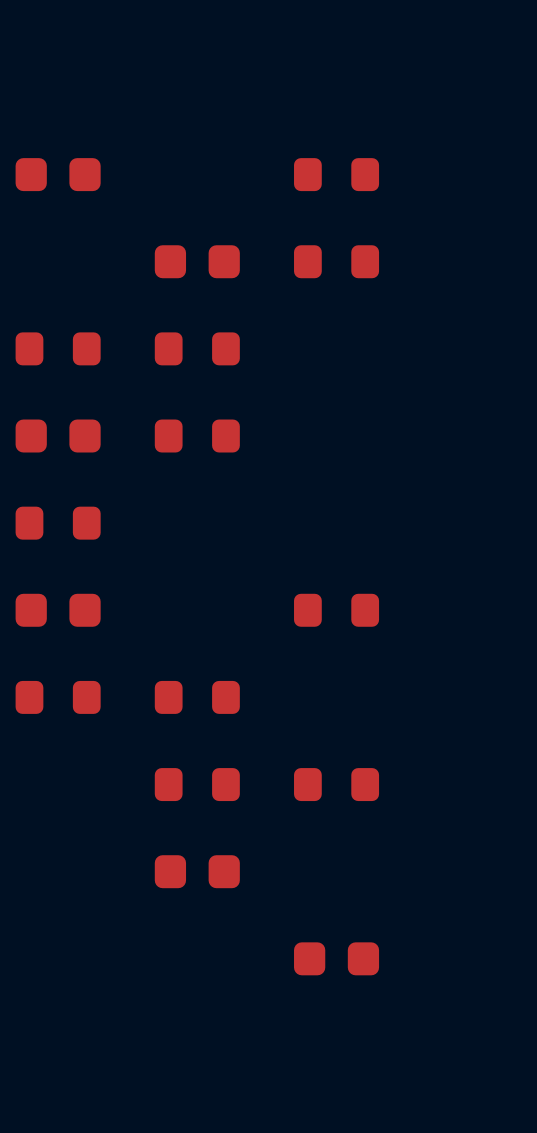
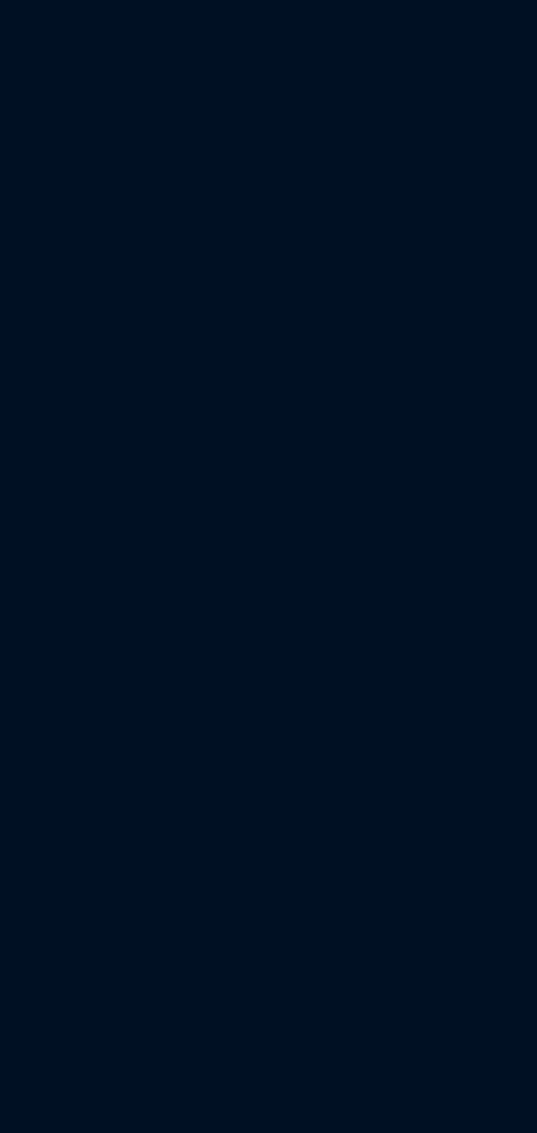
part: (58, 174) -> none
part: (336, 174) -> none
part: (197, 261) -> none
part: (336, 261) -> none
part: (58, 348) -> none
part: (197, 348) -> none
part: (58, 436) -> none
part: (197, 436) -> none
part: (58, 523) -> none
part: (58, 610) -> none
part: (336, 610) -> none
part: (58, 697) -> none
part: (197, 697) -> none
part: (197, 784) -> none
part: (336, 784) -> none
part: (197, 871) -> none
part: (336, 958) -> none

